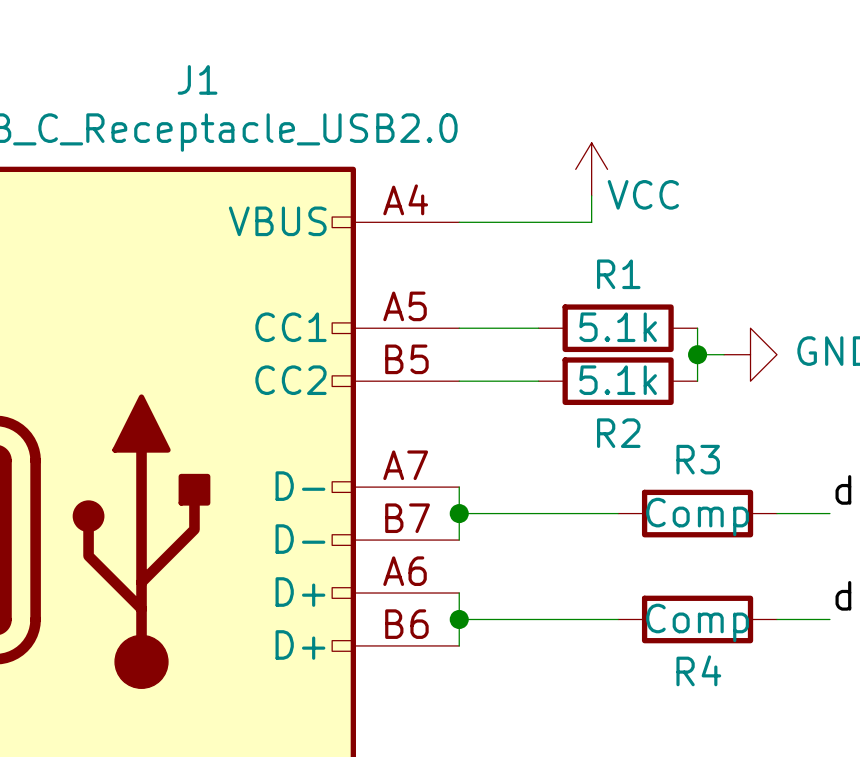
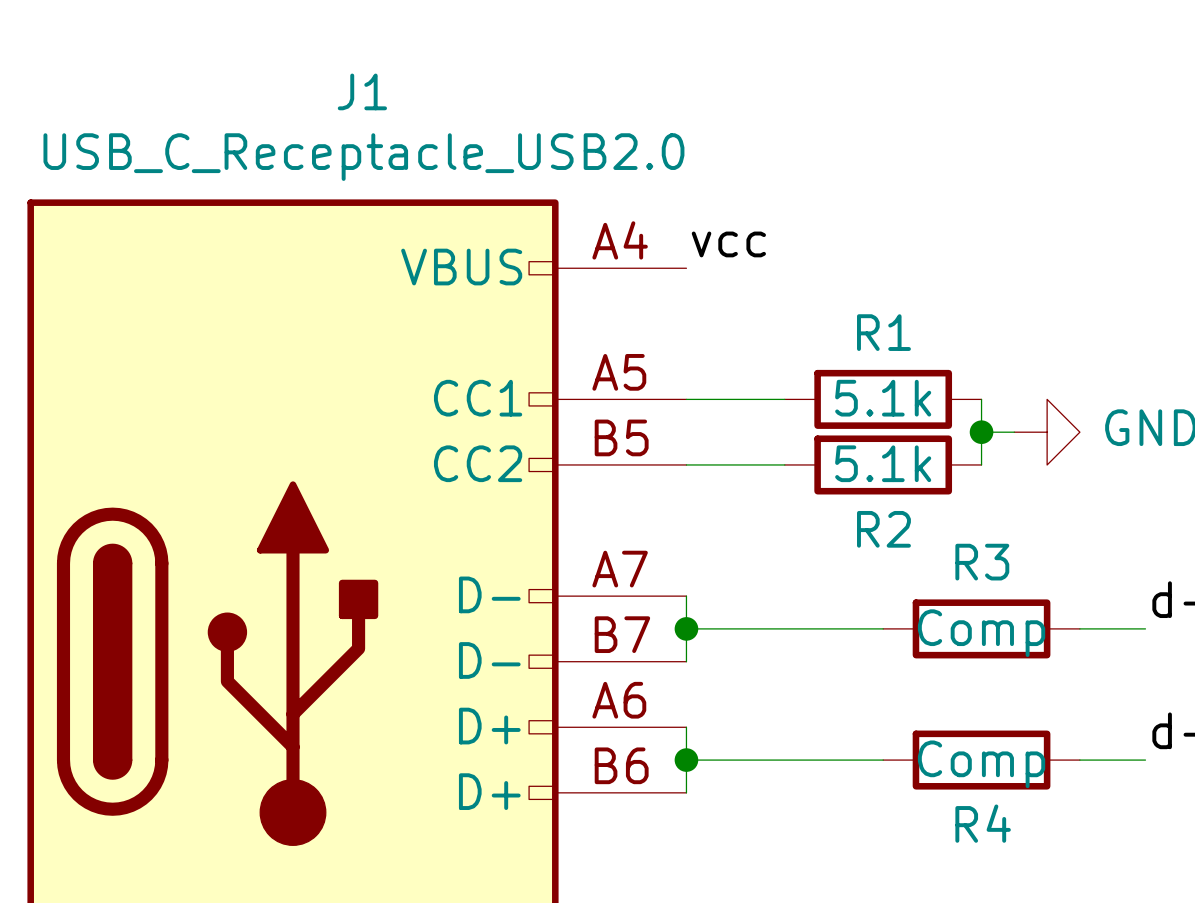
power symbol: VCC (591, 169) -> none
wire: (591, 195) (591, 222) (459, 222) -> none
label: none -> vcc (728, 244)

